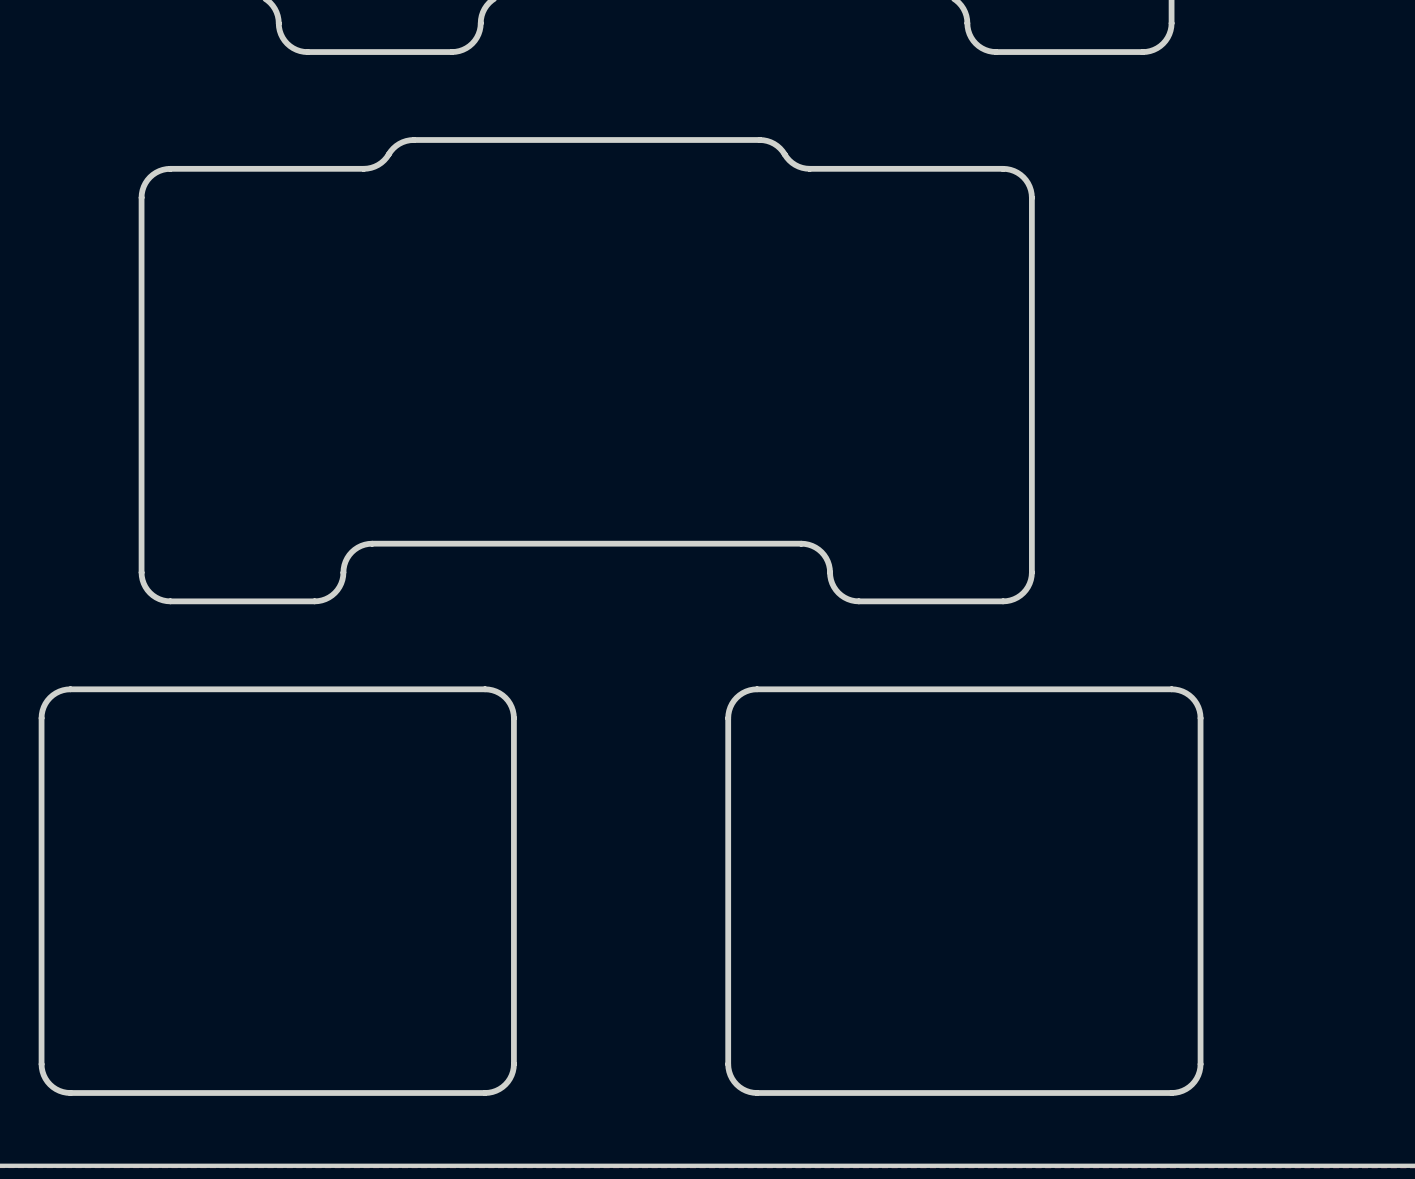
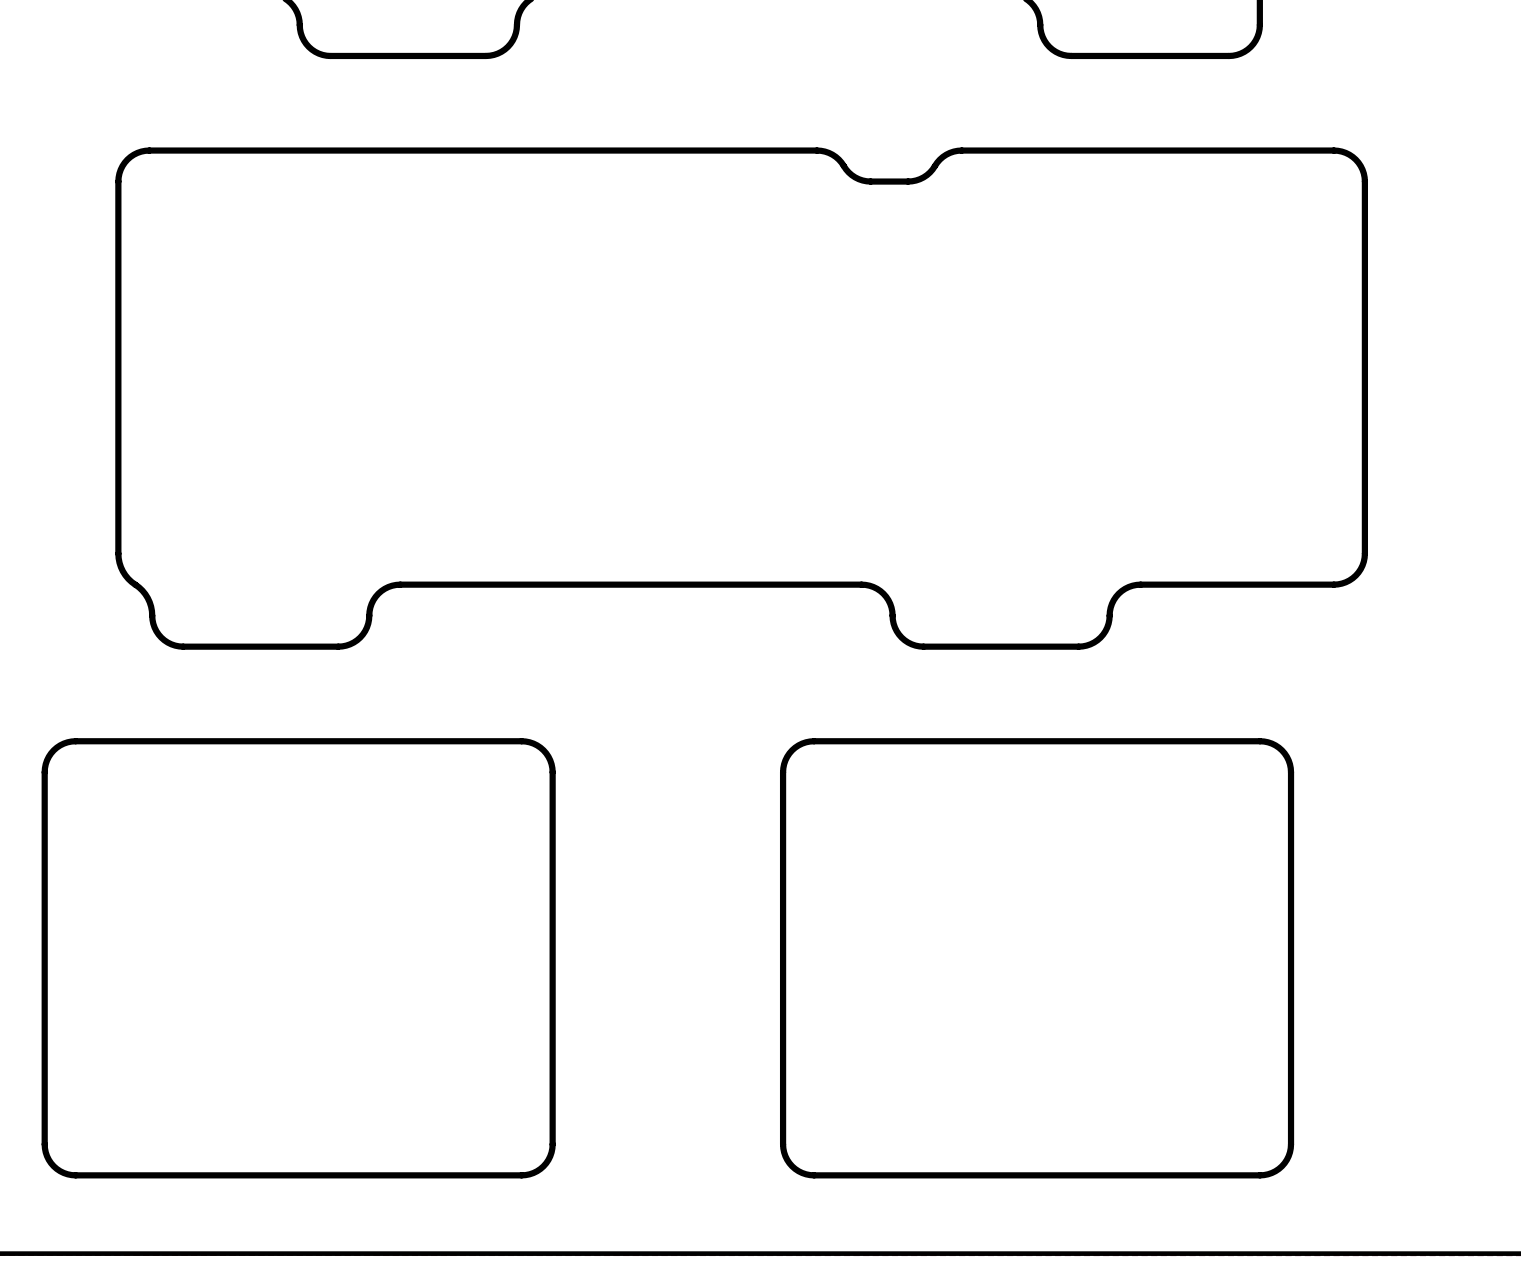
board edge: (413, 139) (399, 143) (381, 162) (367, 168) (166, 169) (155, 172) (145, 183) (141, 197) (141, 572) -> (444, 150) (149, 150) (133, 154) (122, 166) (118, 181) (118, 558) (125, 575) (147, 598) (152, 615)
board edge: (844, 168) (1006, 169) (1020, 174) (1029, 186) (1031, 197) (1031, 572) -> (908, 181) (919, 179) (926, 175) (946, 154) (961, 150) (1333, 150) (1349, 154) (1355, 159) (1362, 169) (1364, 181) (1364, 553) (1360, 569) (1349, 580) (1337, 584) (1136, 584) (1125, 588) (1118, 593) (1112, 603) (1109, 615)

